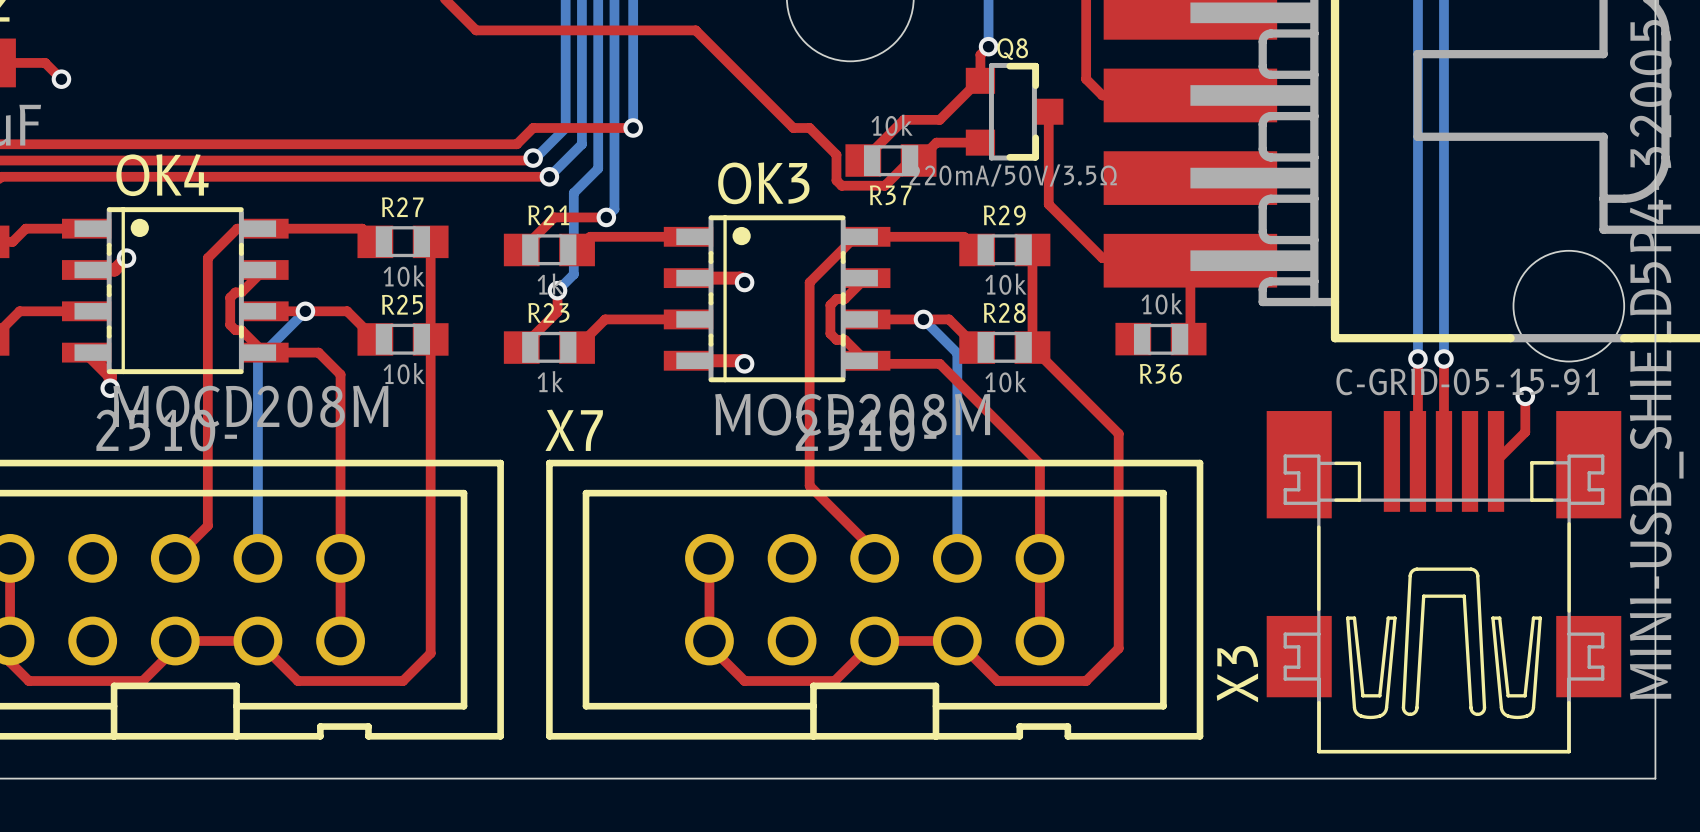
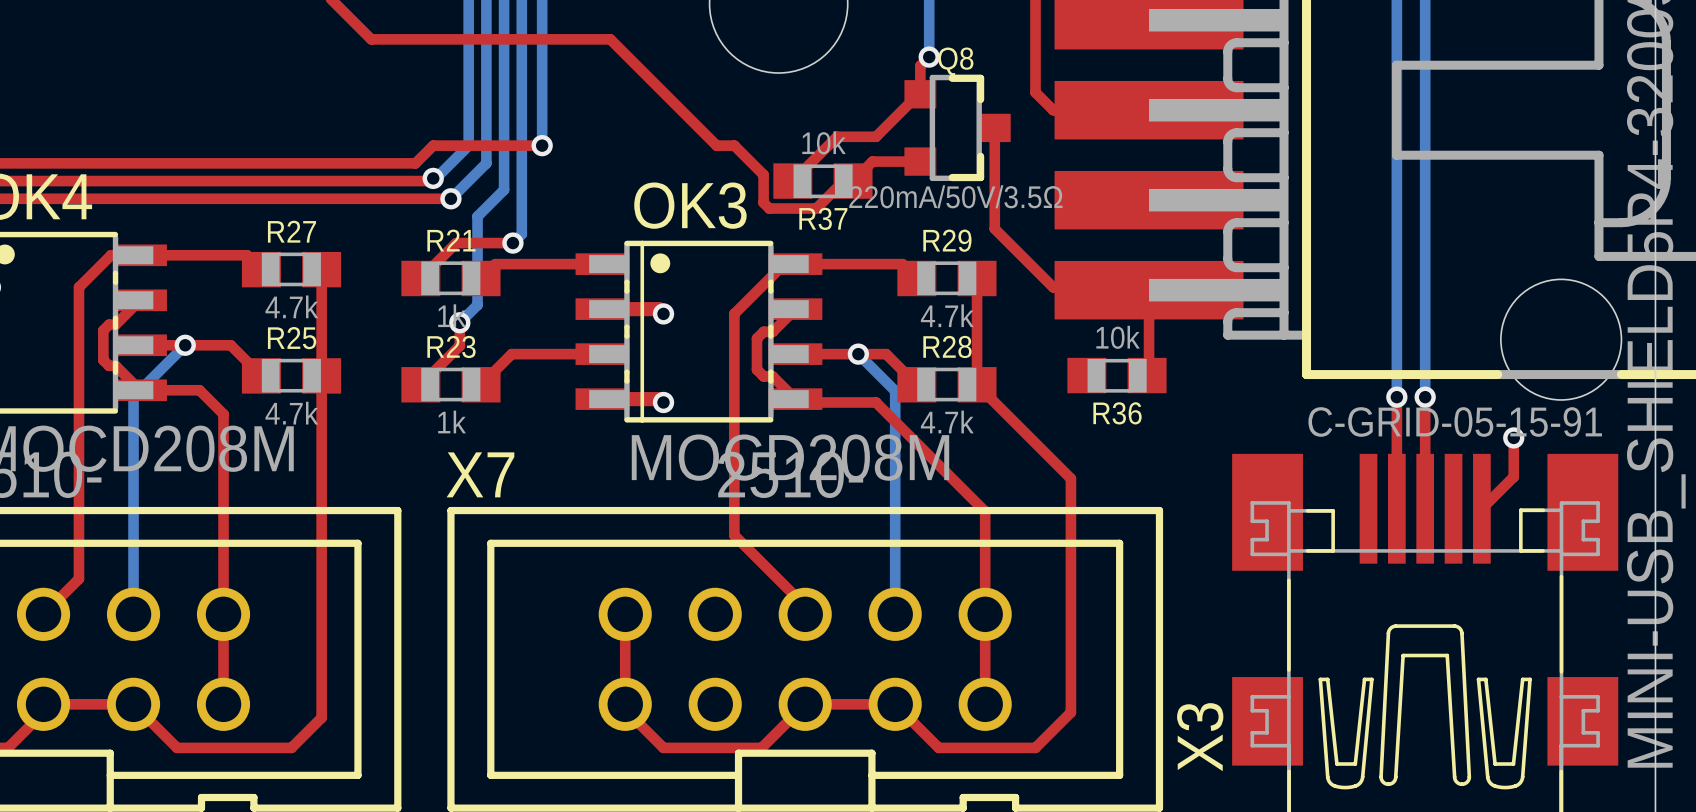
R27 value: 10k (404, 276) -> 4.7k (291, 306)
R29 value: 10k (1005, 284) -> 4.7k (947, 315)
R25 value: 10k (404, 373) -> 4.7k (291, 413)
R28 value: 10k (1005, 381) -> 4.7k (947, 421)

